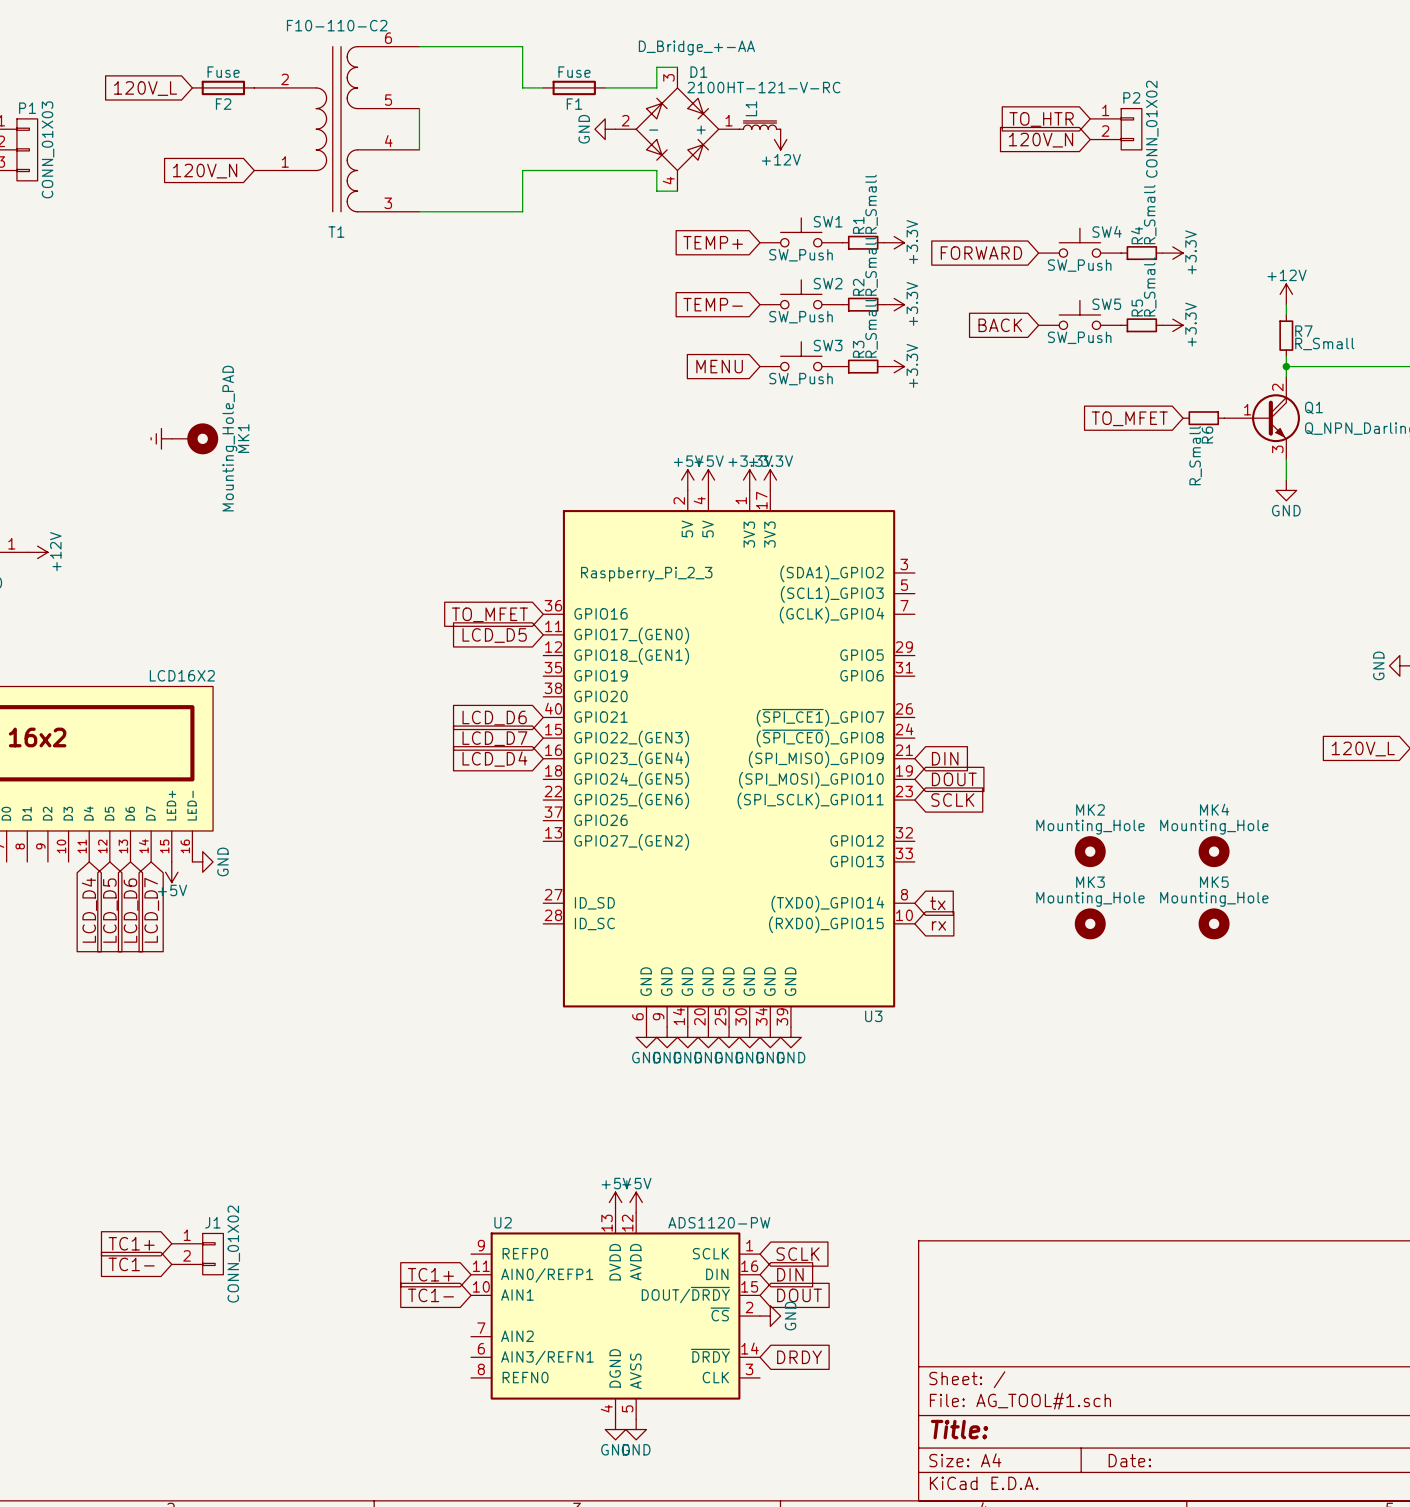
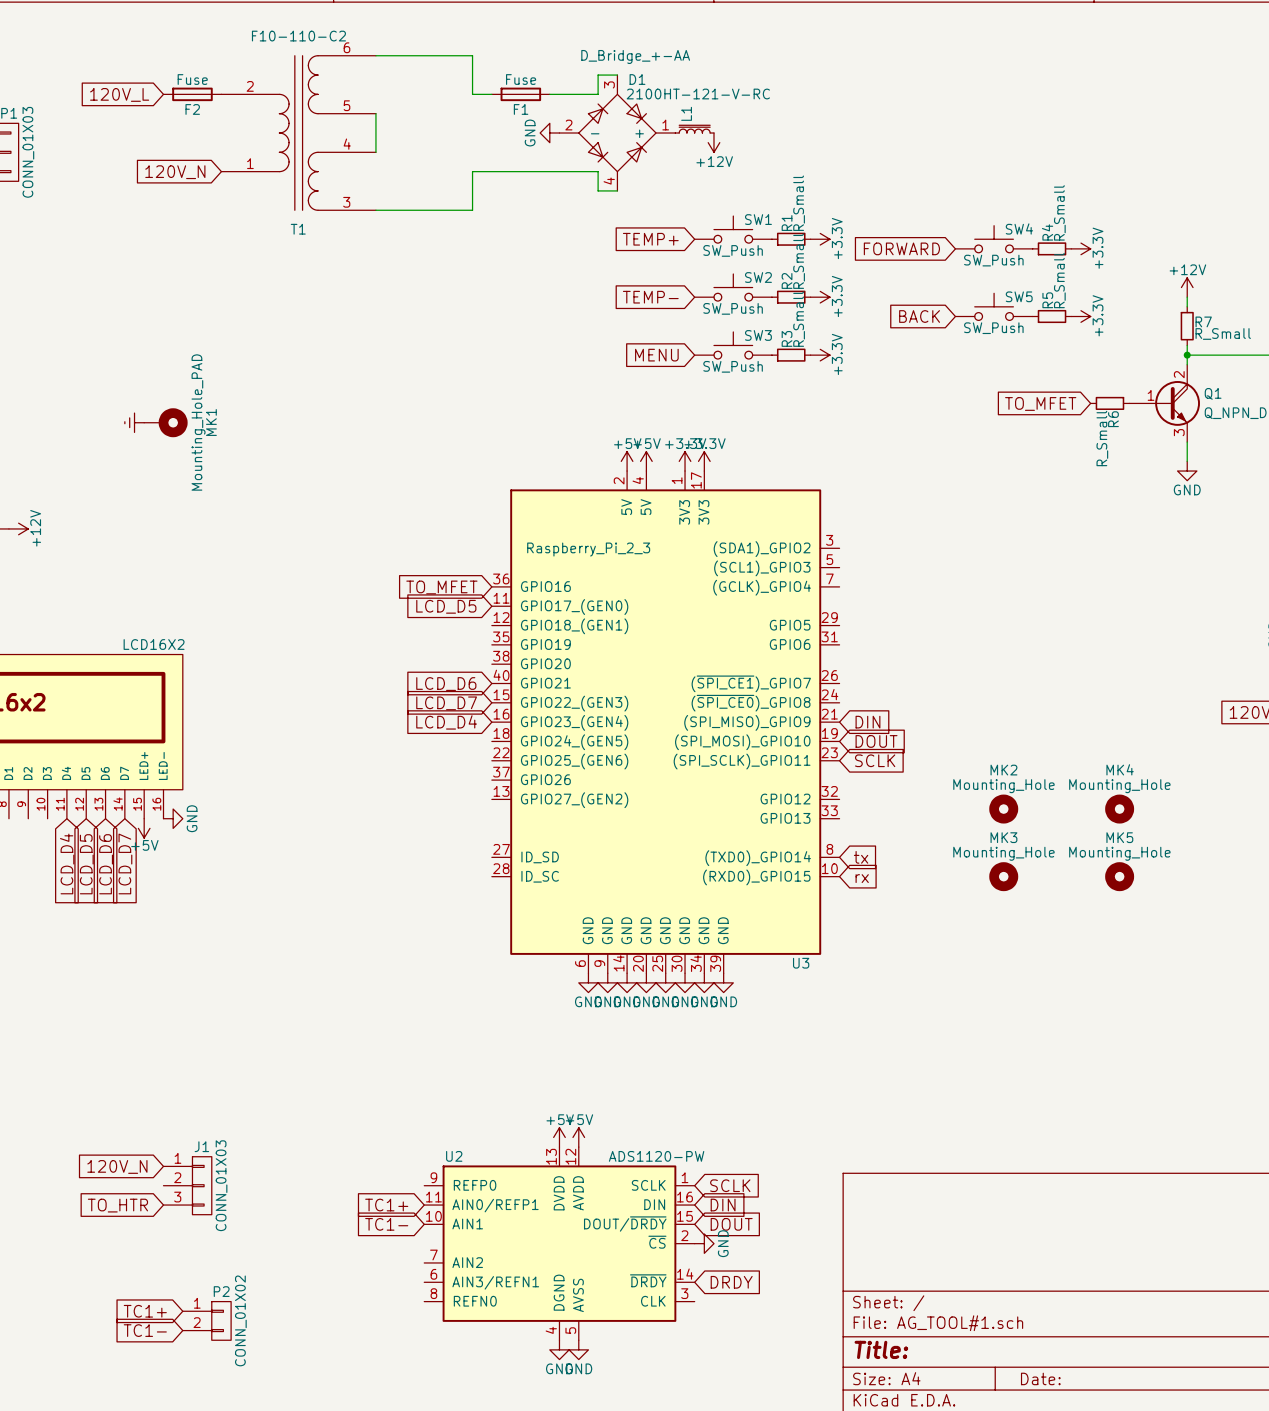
global label: TO_HTR (1041, 119) -> none
P2 position: (1116, 129) -> (206, 1320)
global label: 120V_N (1041, 140) -> none
J1 symbol: [171, 1233, 224, 1275] -> [163, 1156, 212, 1215]
global label: none -> 120V_N (117, 1166)
global label position: TC1+ (131, 1243) -> TC1+ (145, 1311)
J1 value: CONN_01X02 (233, 1254) -> CONN_01X03 (221, 1185)
global label position: TC1- (131, 1264) -> TC1- (145, 1330)
global label: none -> TO_HTR (117, 1205)

